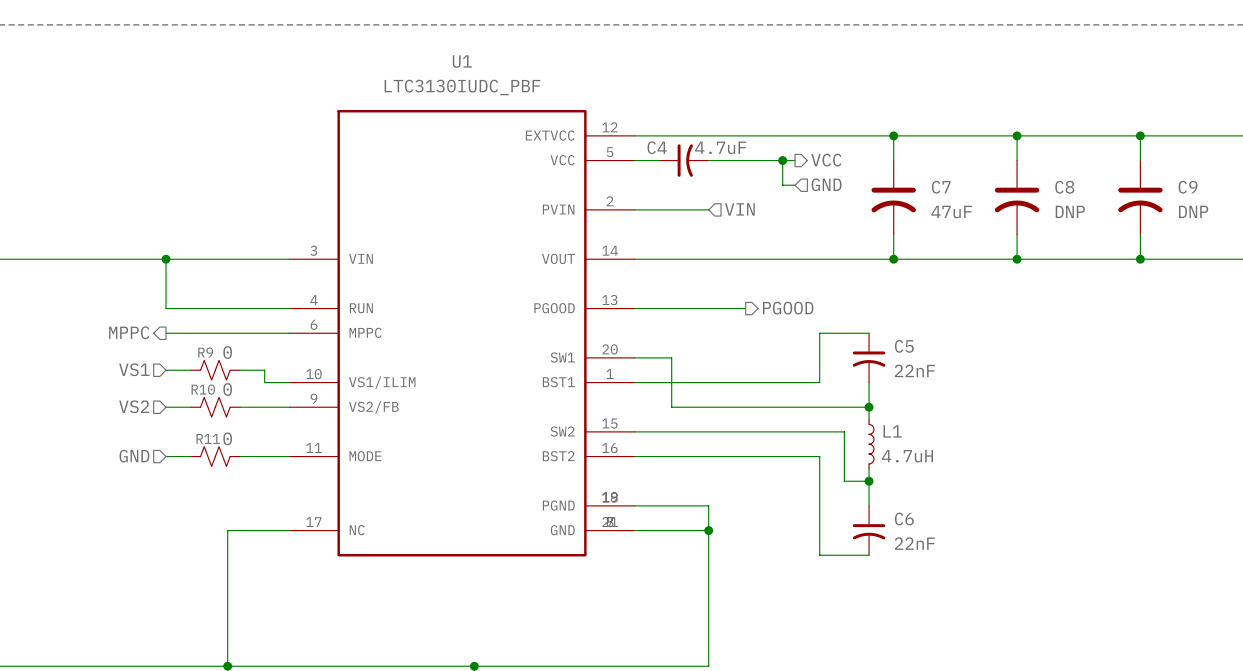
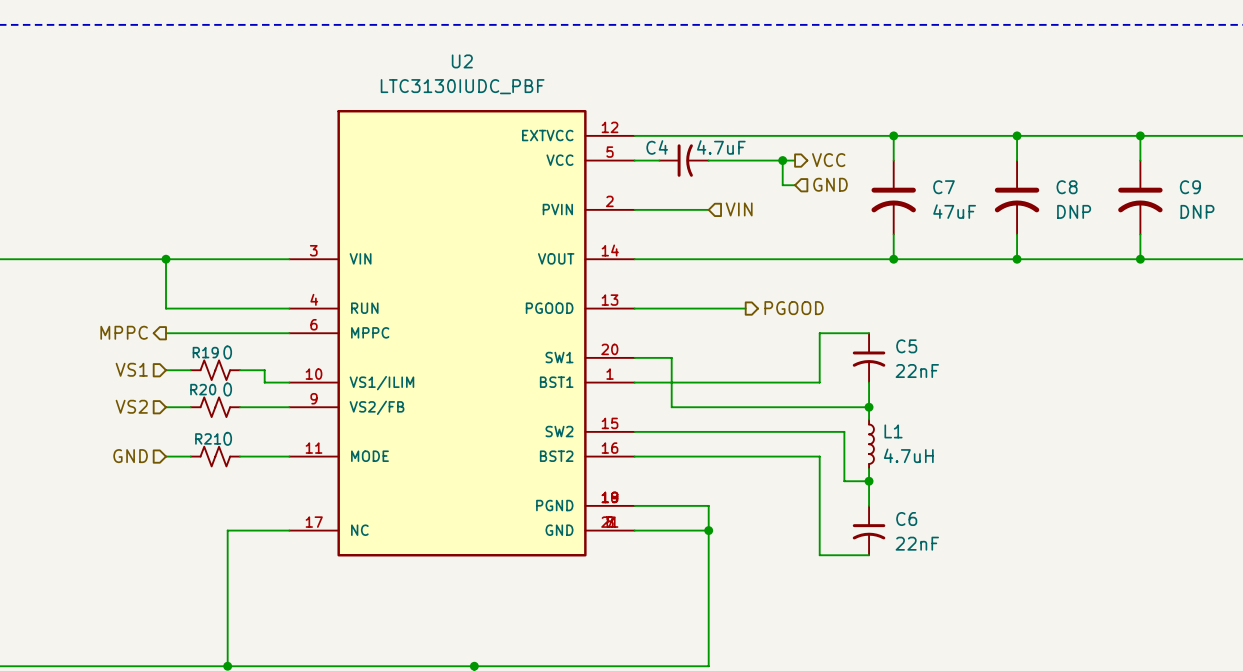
U1 name: U1 (462, 61) -> U2 (462, 61)
R9 name: R9 (205, 352) -> R19 (205, 352)
R10 name: R10 (203, 389) -> R20 (203, 389)
R11 name: R11 (208, 438) -> R21 (208, 438)

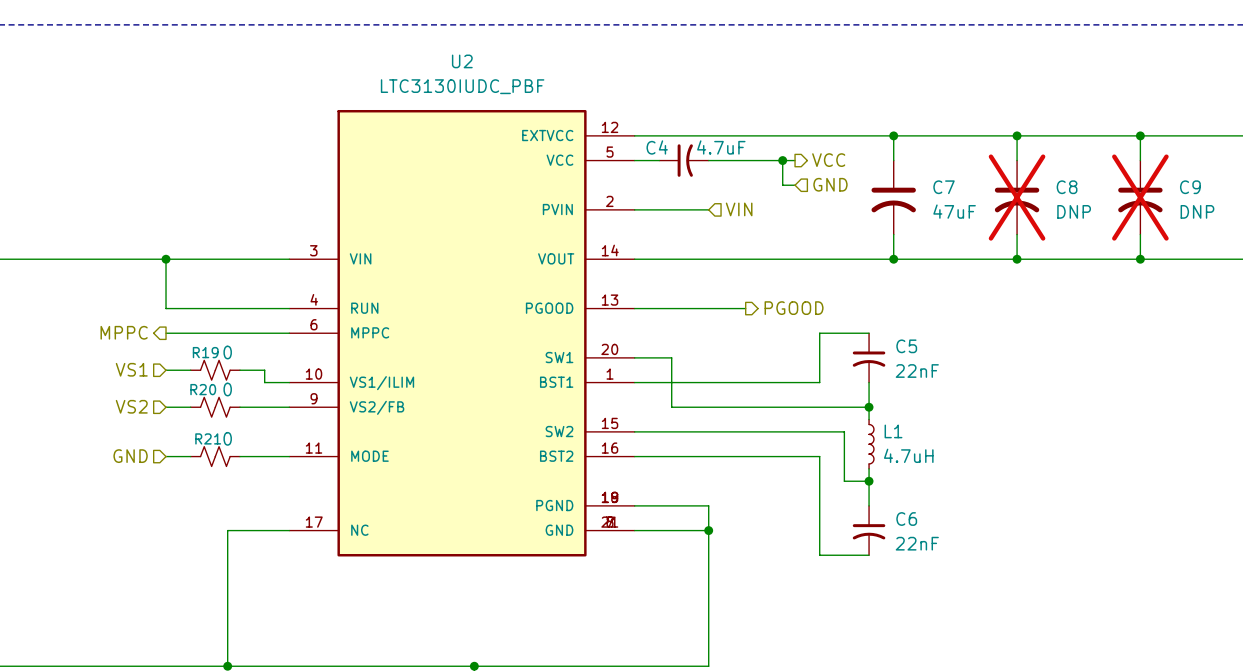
C8 do-not-place cross: none -> (1017, 197)
C9 do-not-place cross: none -> (1140, 197)

